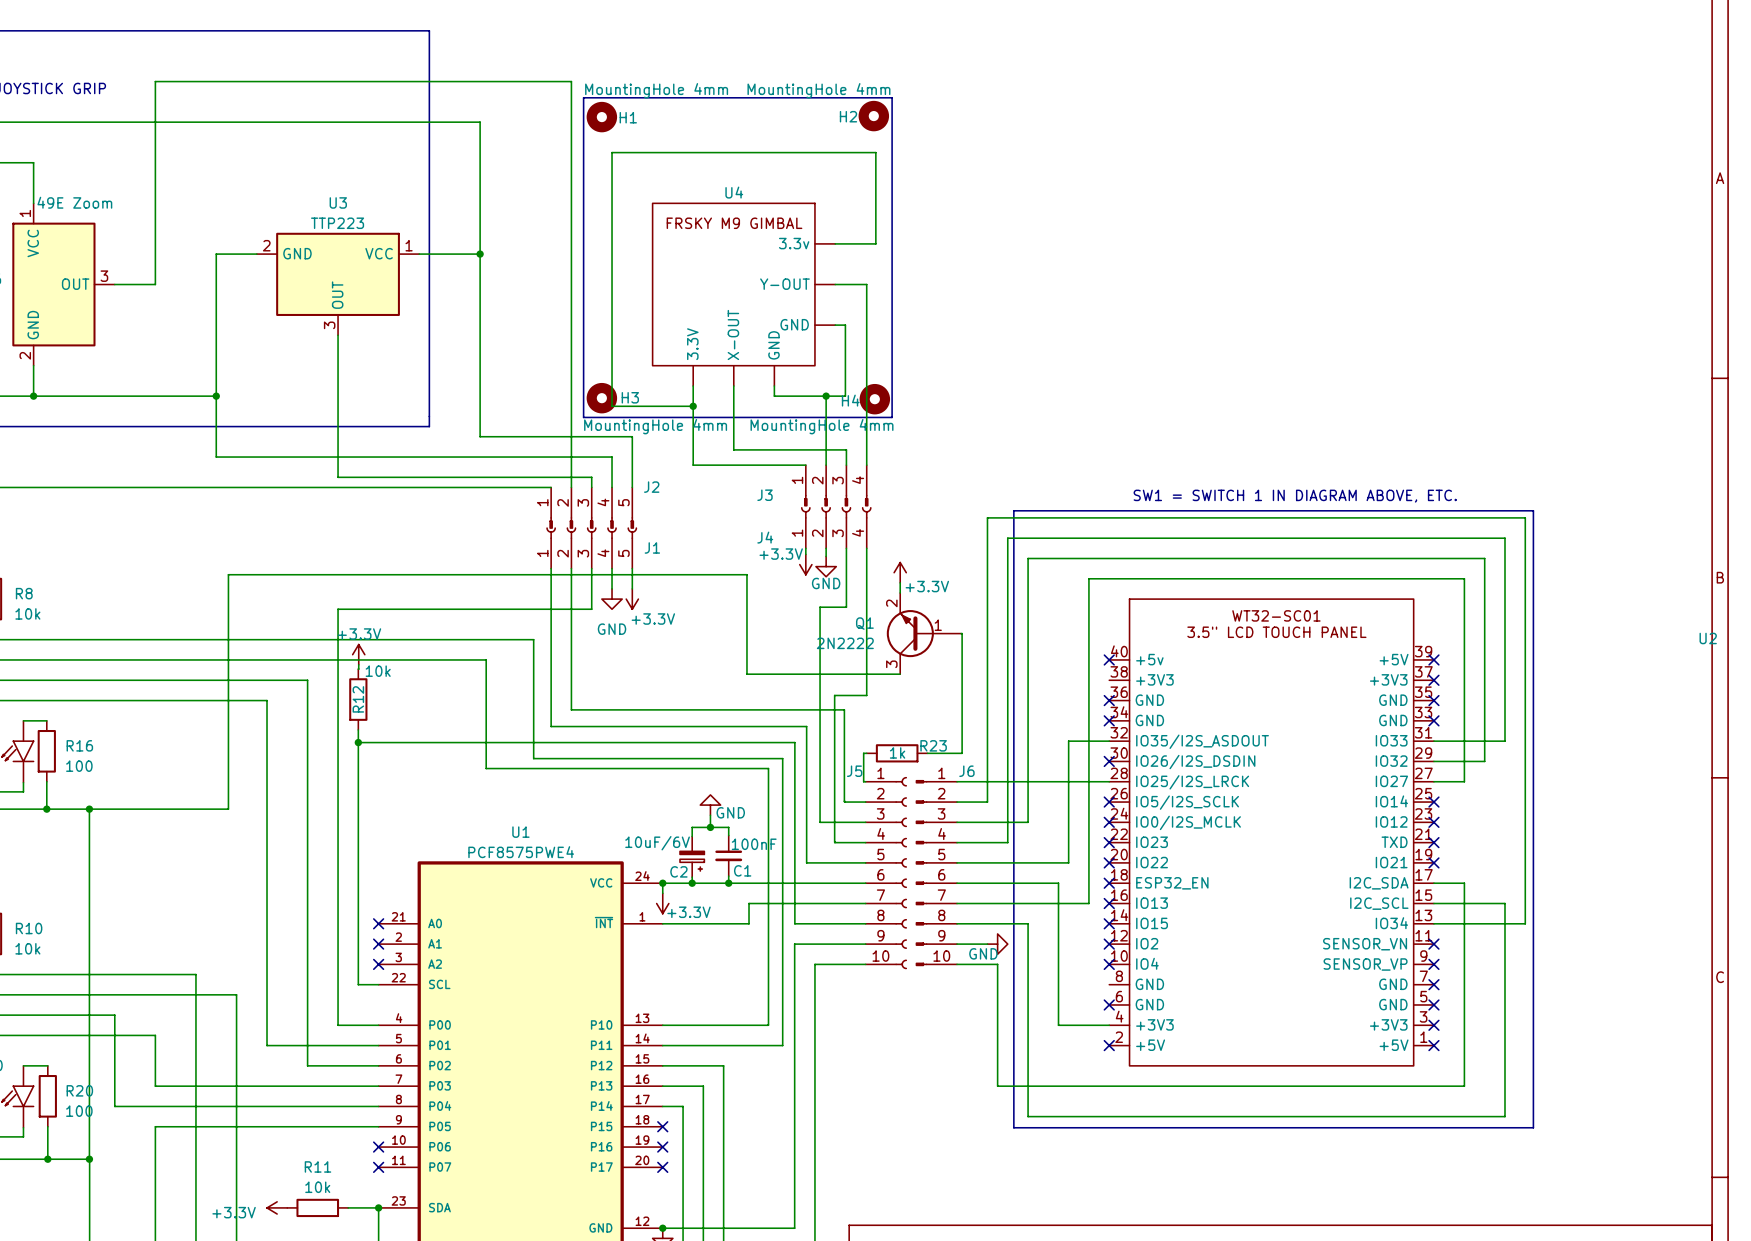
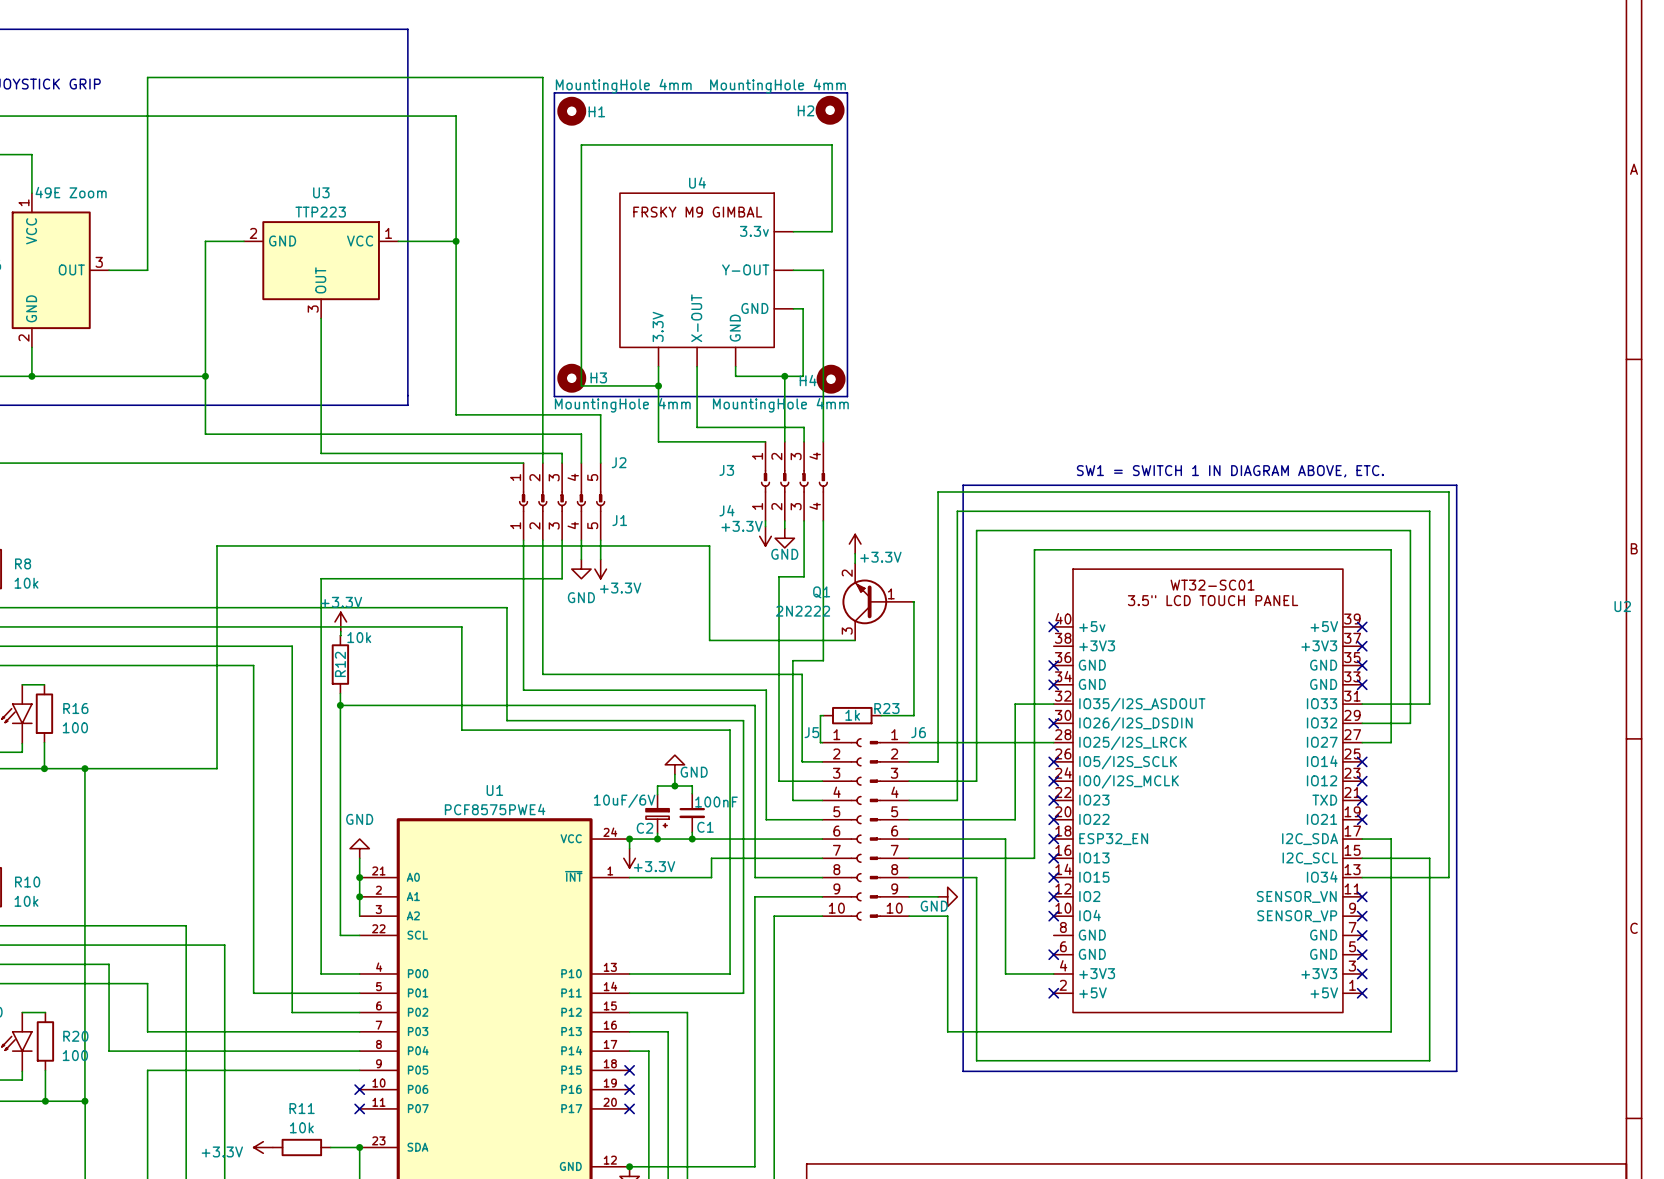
power symbol: none -> GND (359, 848)
wire: none -> (359, 858) (359, 916)
no-connect mark: (378, 923) -> none
junction: none -> (359, 877)
no-connect mark: (378, 944) -> none
junction: none -> (359, 896)
no-connect mark: (378, 964) -> none

